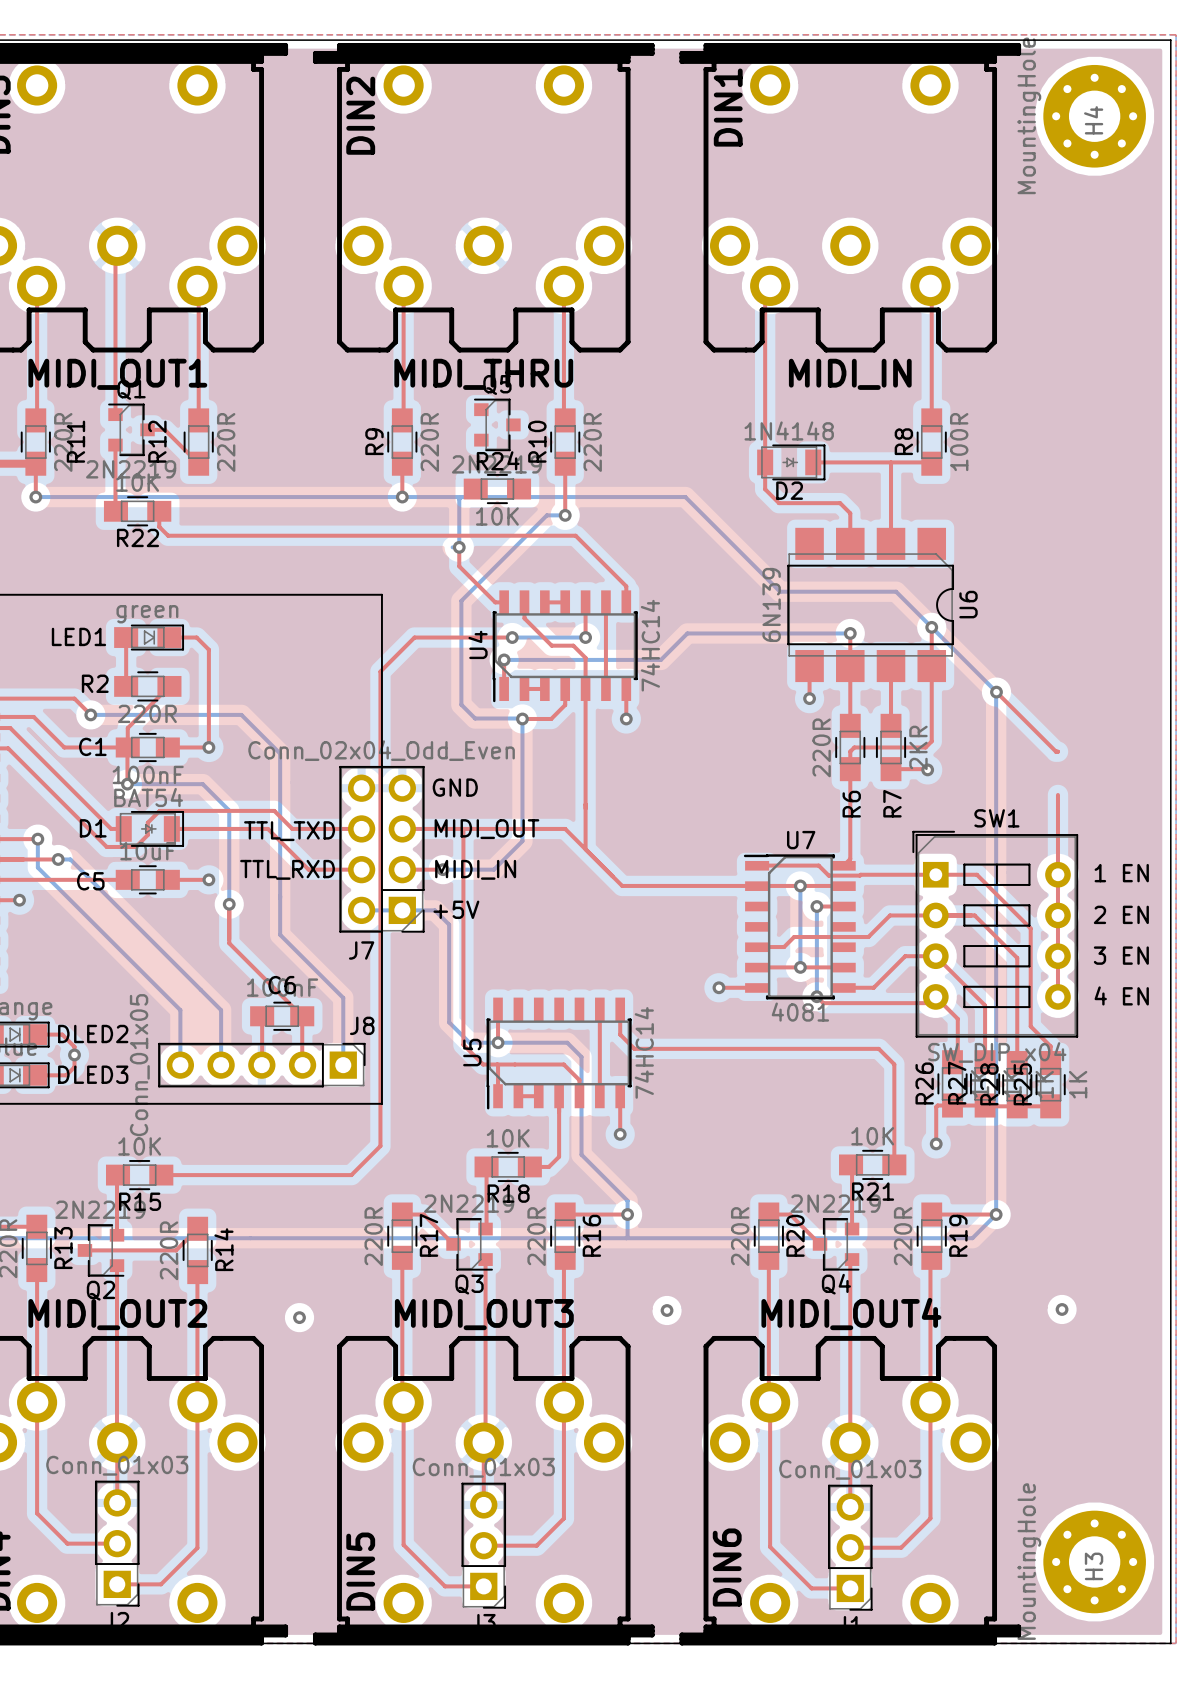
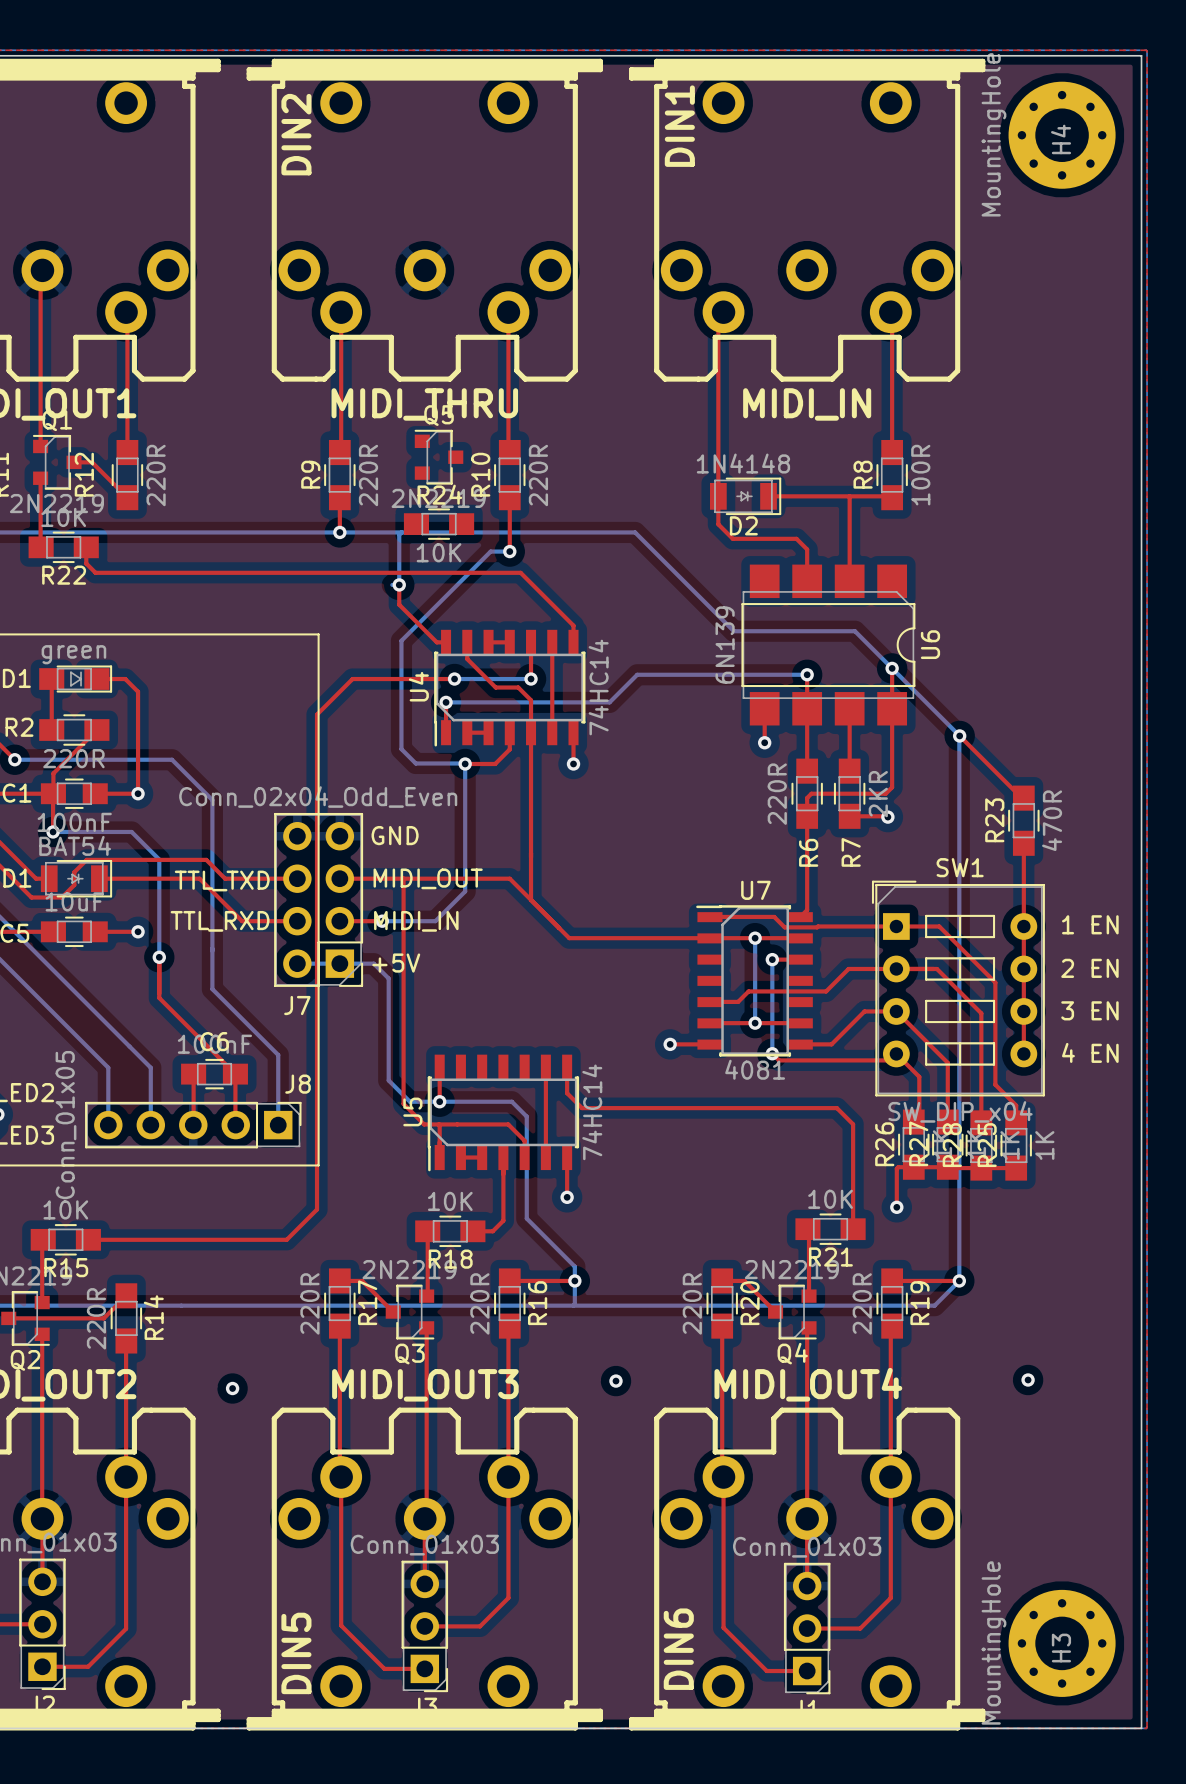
R23: none -> 470R (1023, 820)

